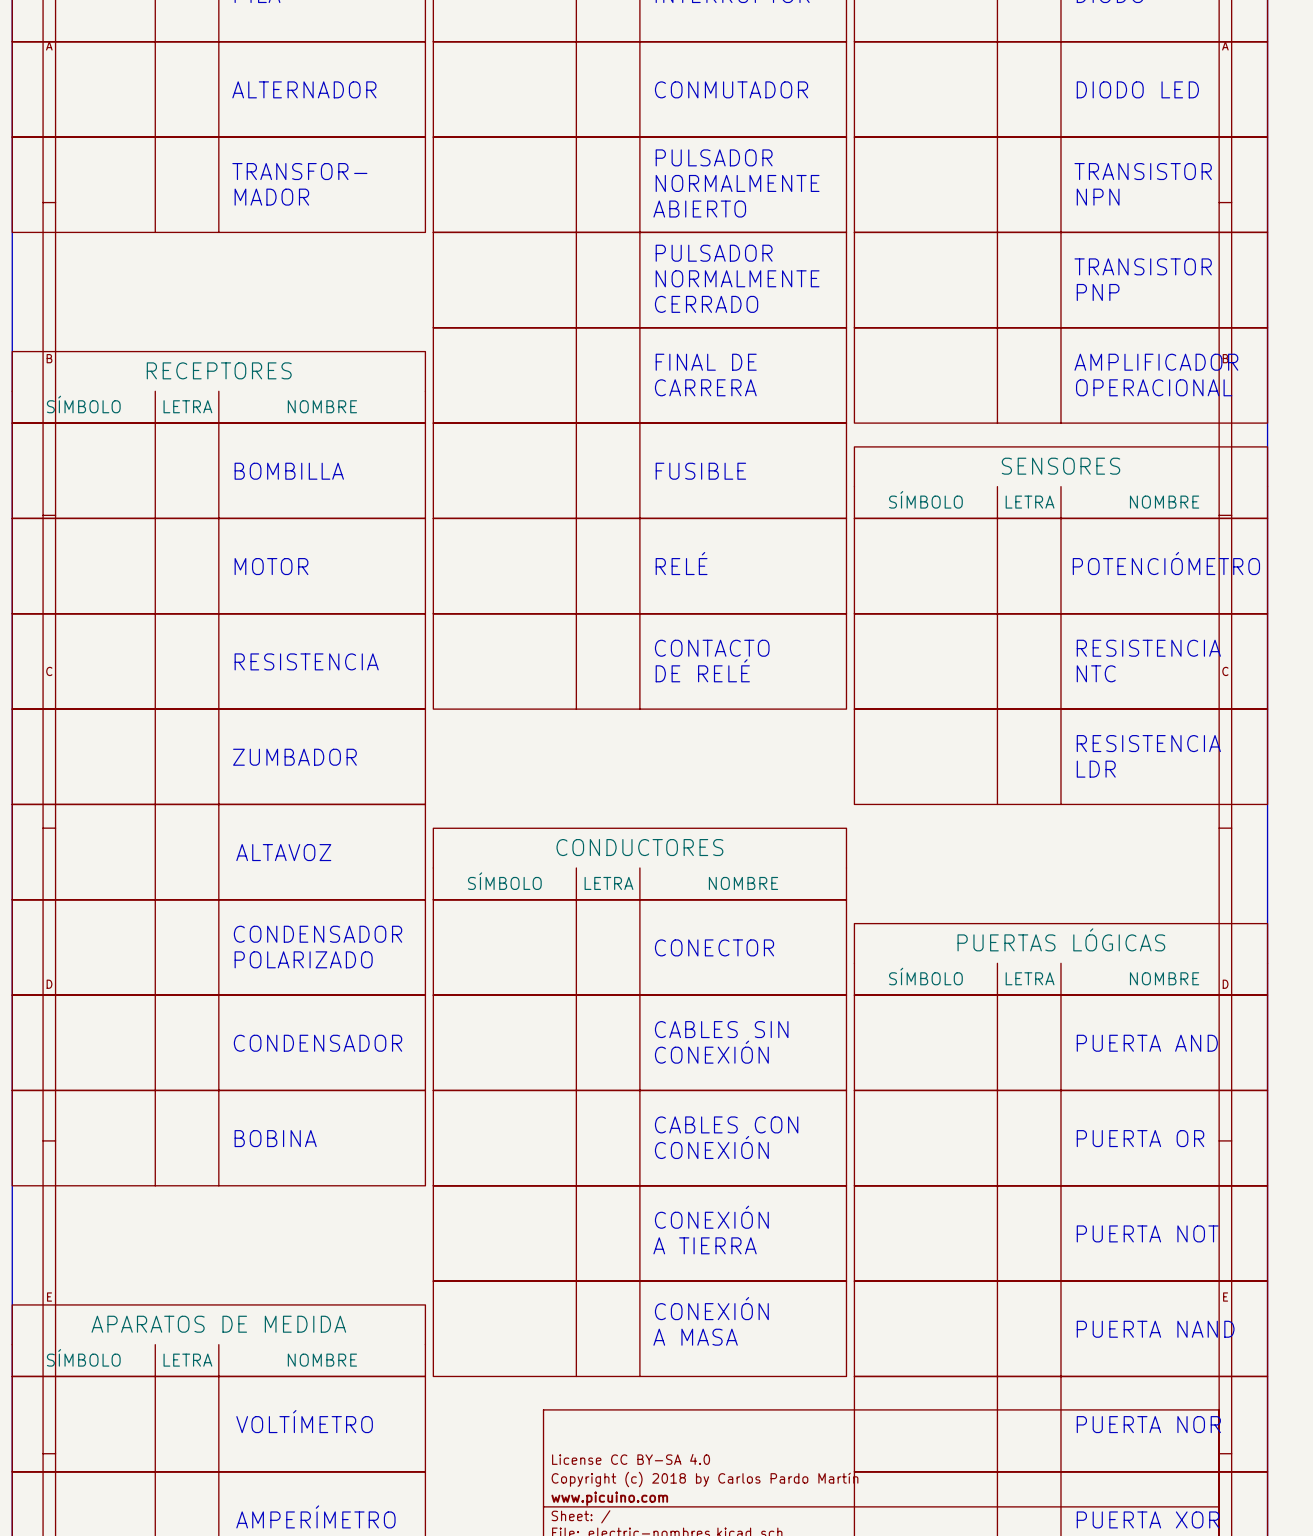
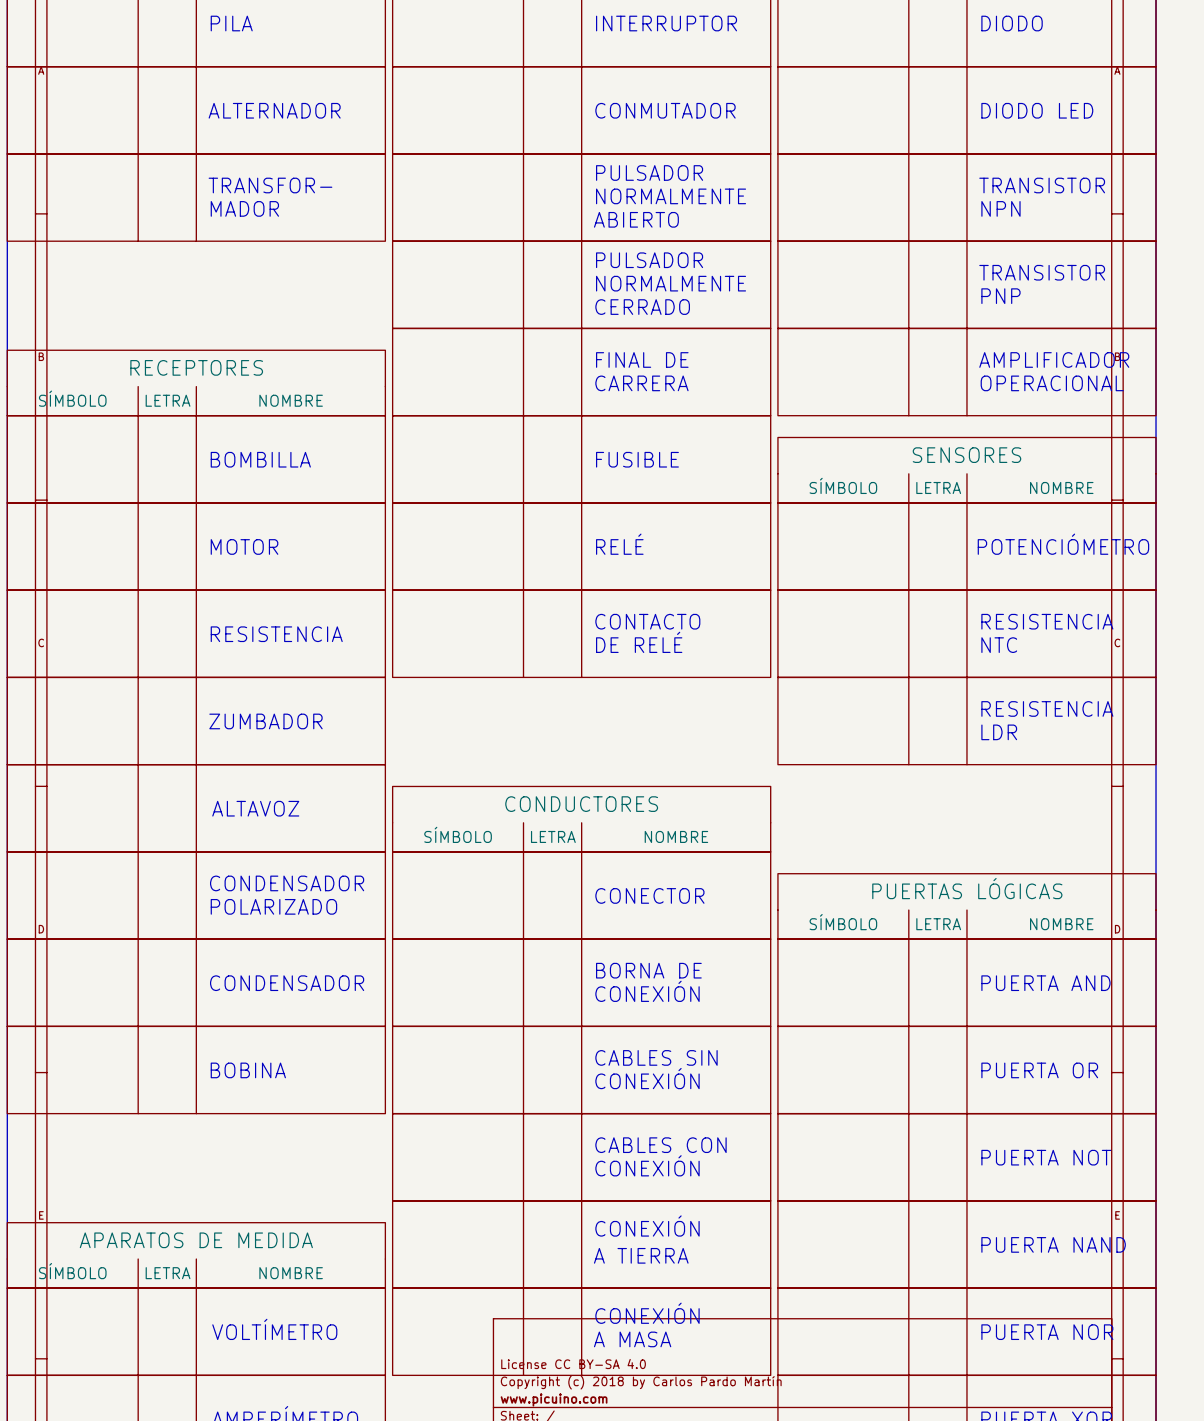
text: CABLES SIN (721, 1029) -> BORNA DE (648, 970)
text: CABLES CON (726, 1124) -> CABLES SIN (656, 1057)
text: CONEXIÓN (711, 1217) -> CABLES CON (660, 1145)
text: A TIERRA (705, 1245) -> CONEXIÓN (647, 1165)
text: A MASA (695, 1337) -> A TIERRA (641, 1255)
text: none -> CONEXIÓN (647, 1313)
part: none -> (581, 1331)
text: none -> A MASA (632, 1339)

